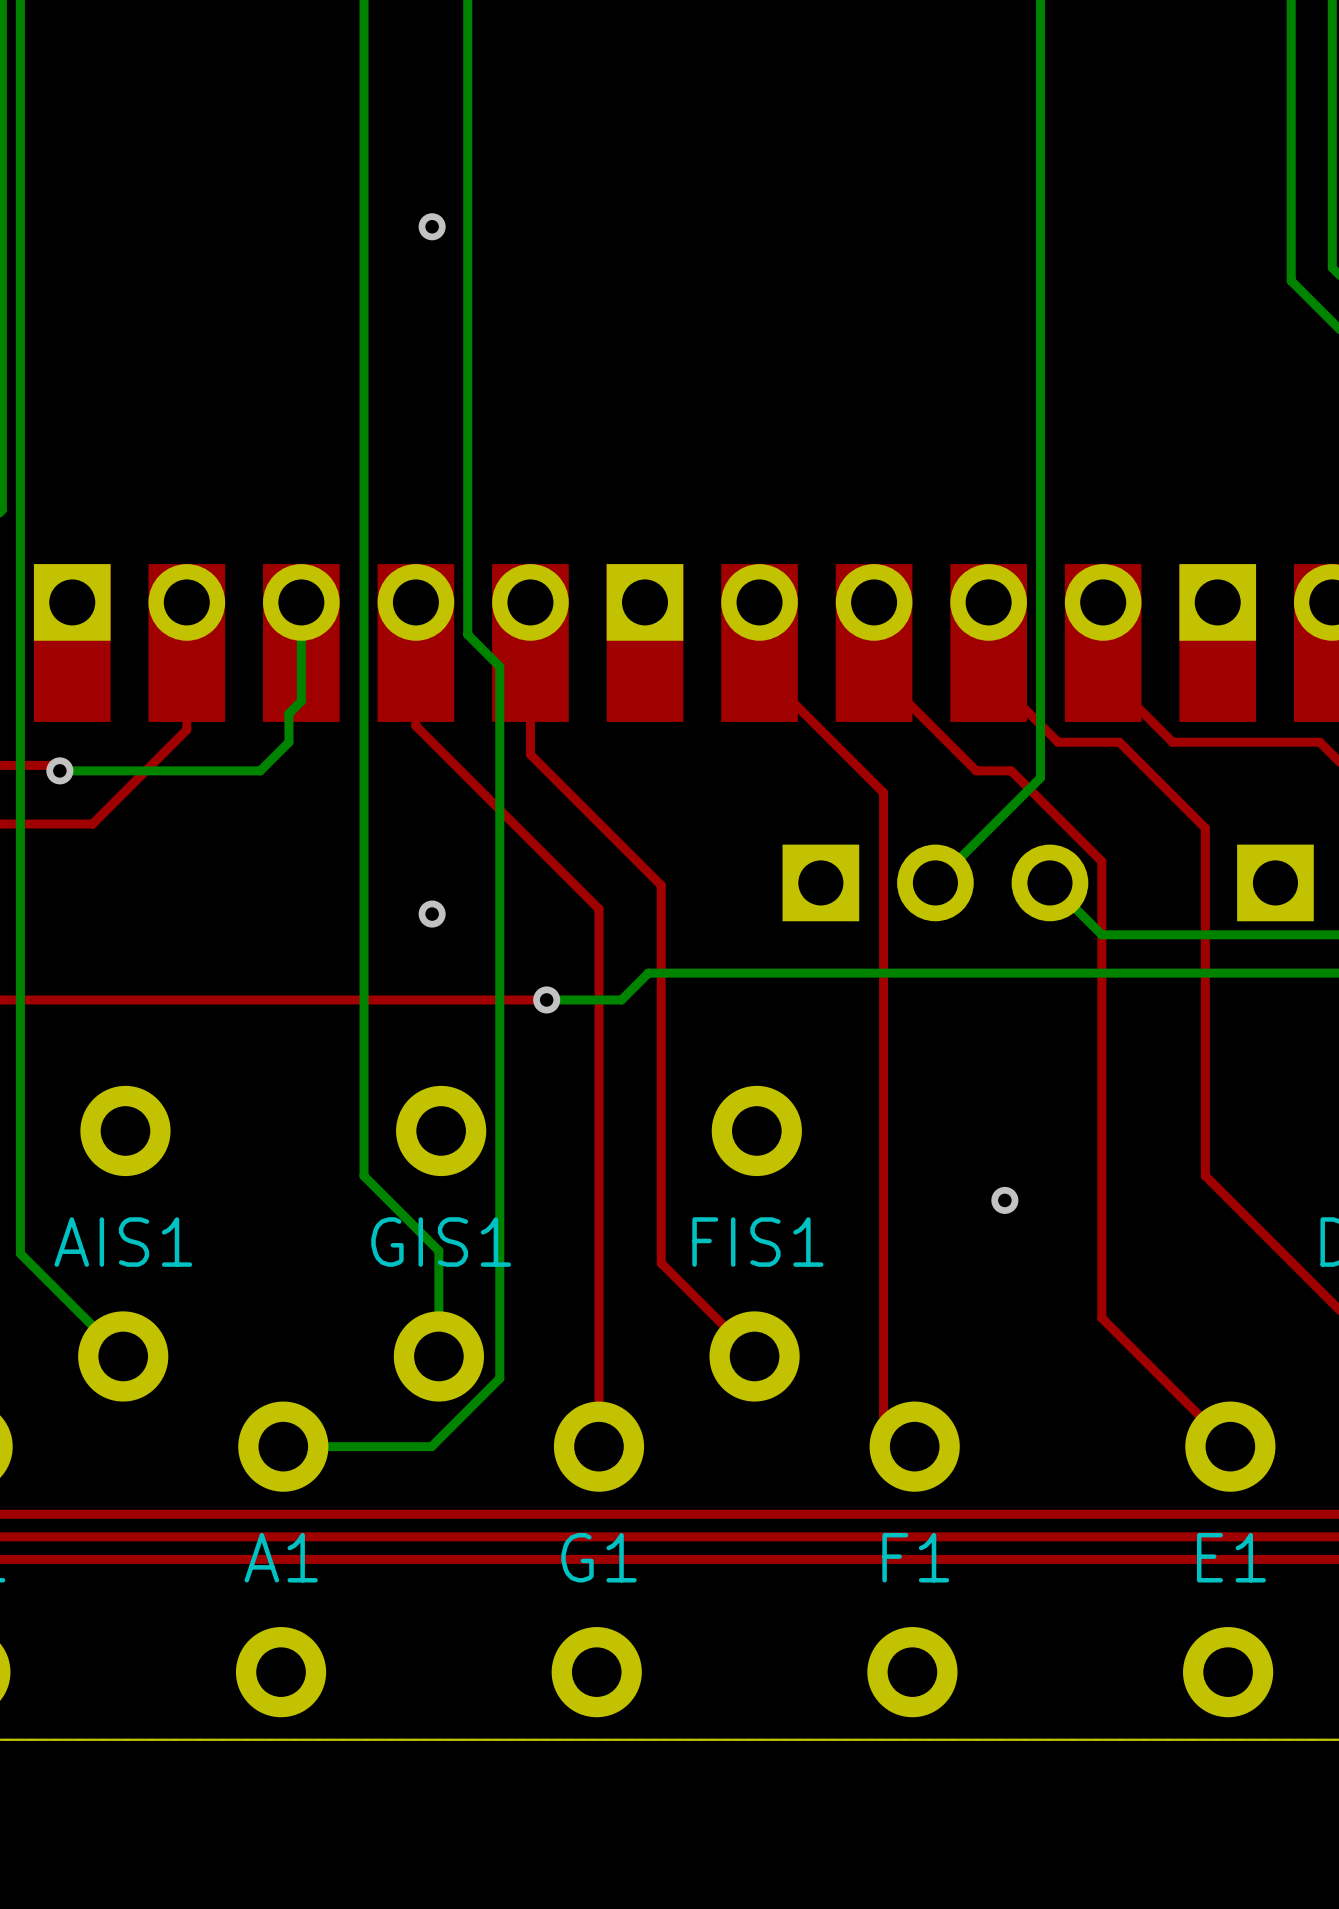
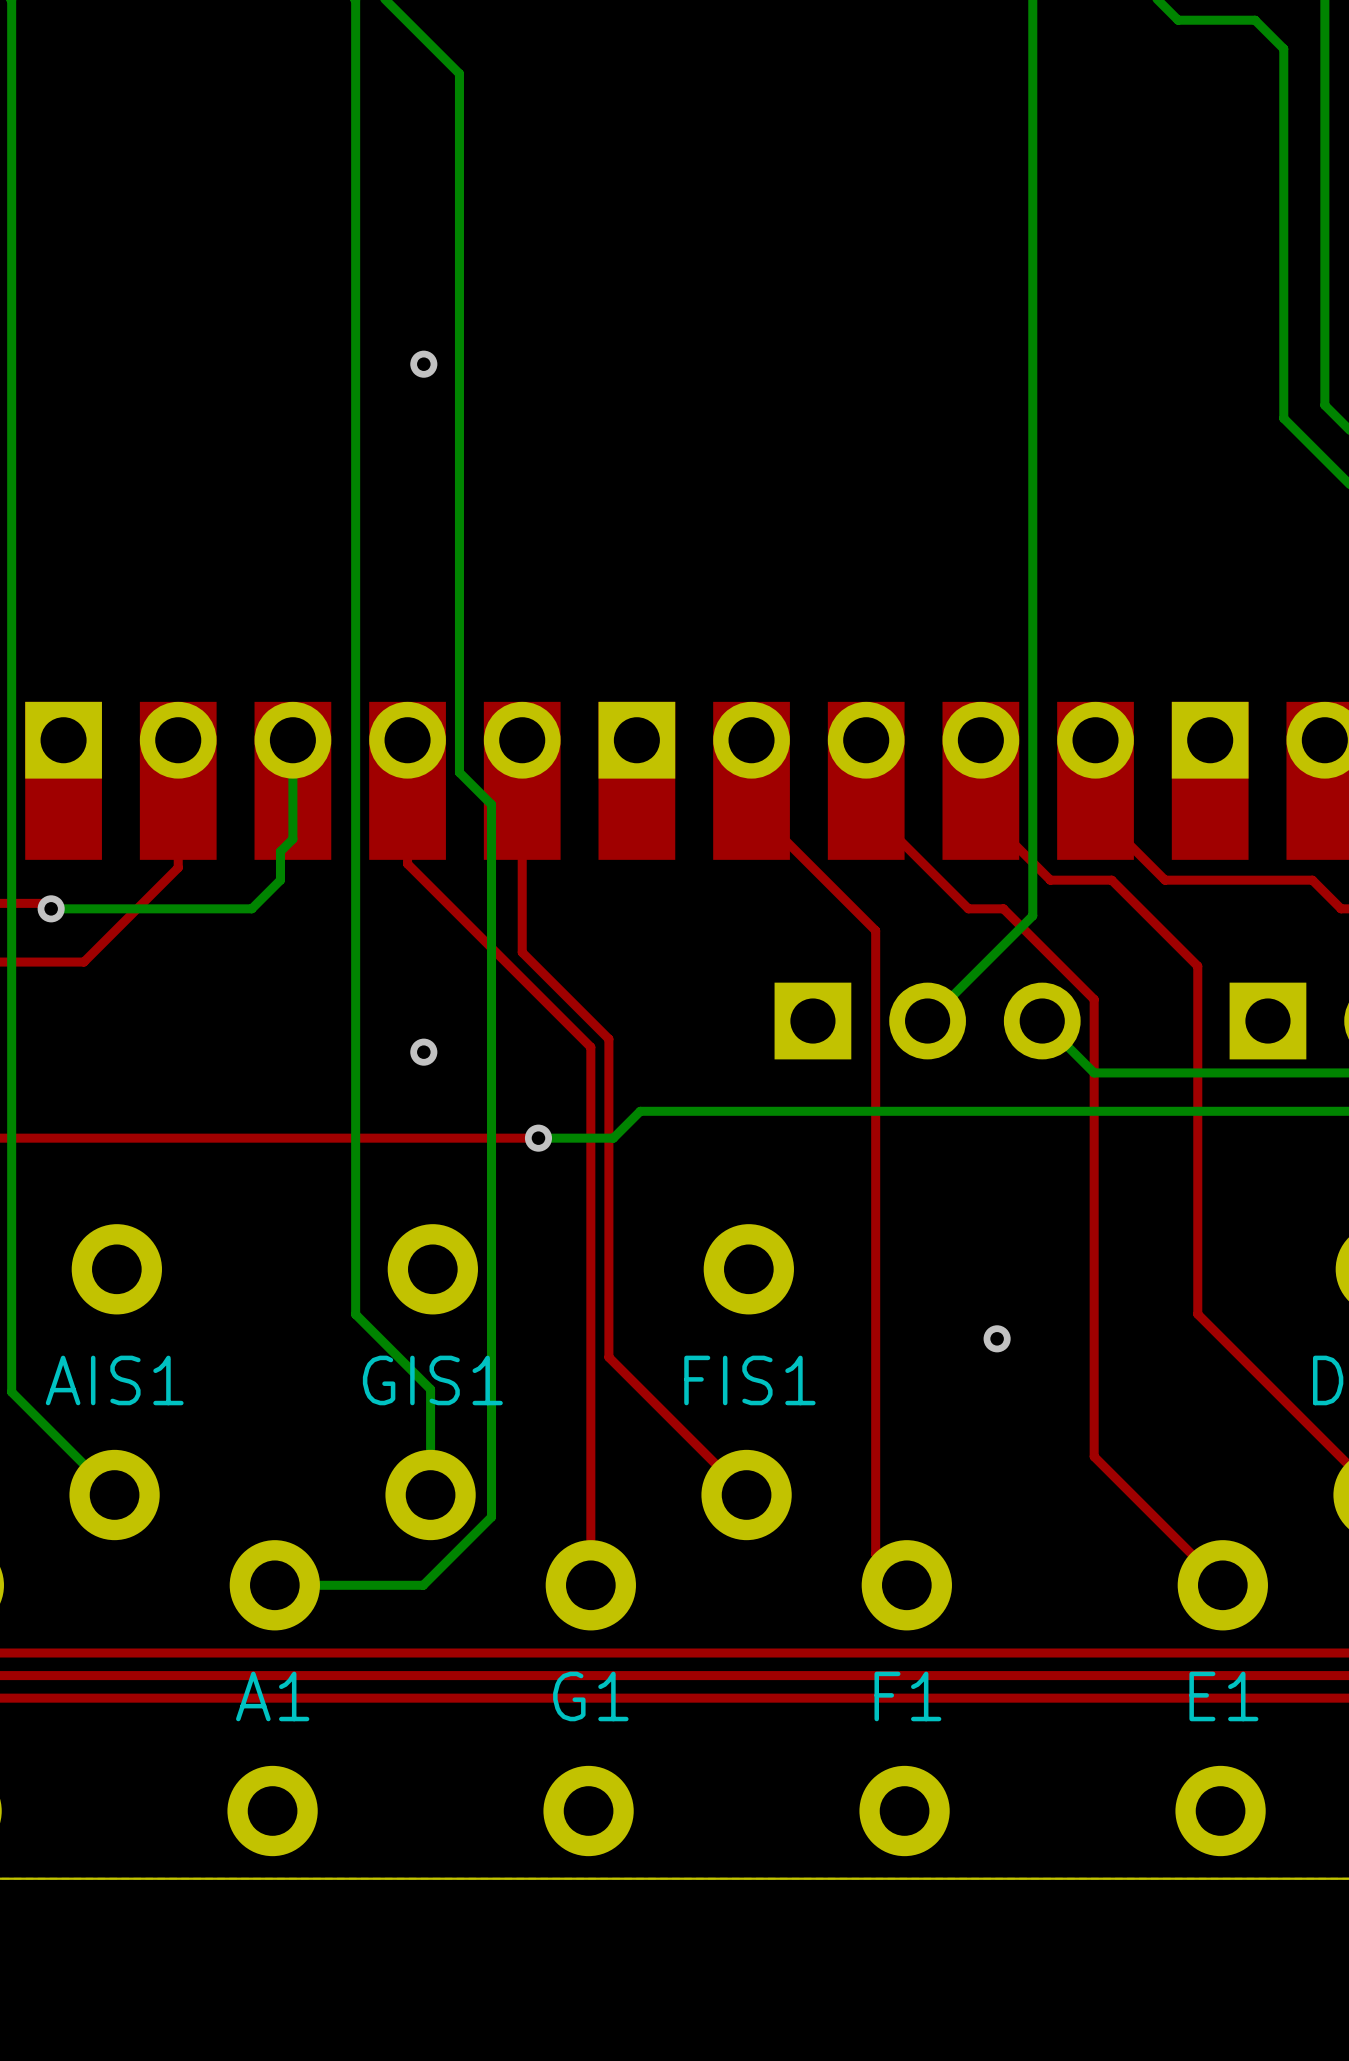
top track: (530, 754) (661, 885) (661, 1263) -> (522, 892) (522, 952) (608, 1039) (608, 1357) (653, 1401)

